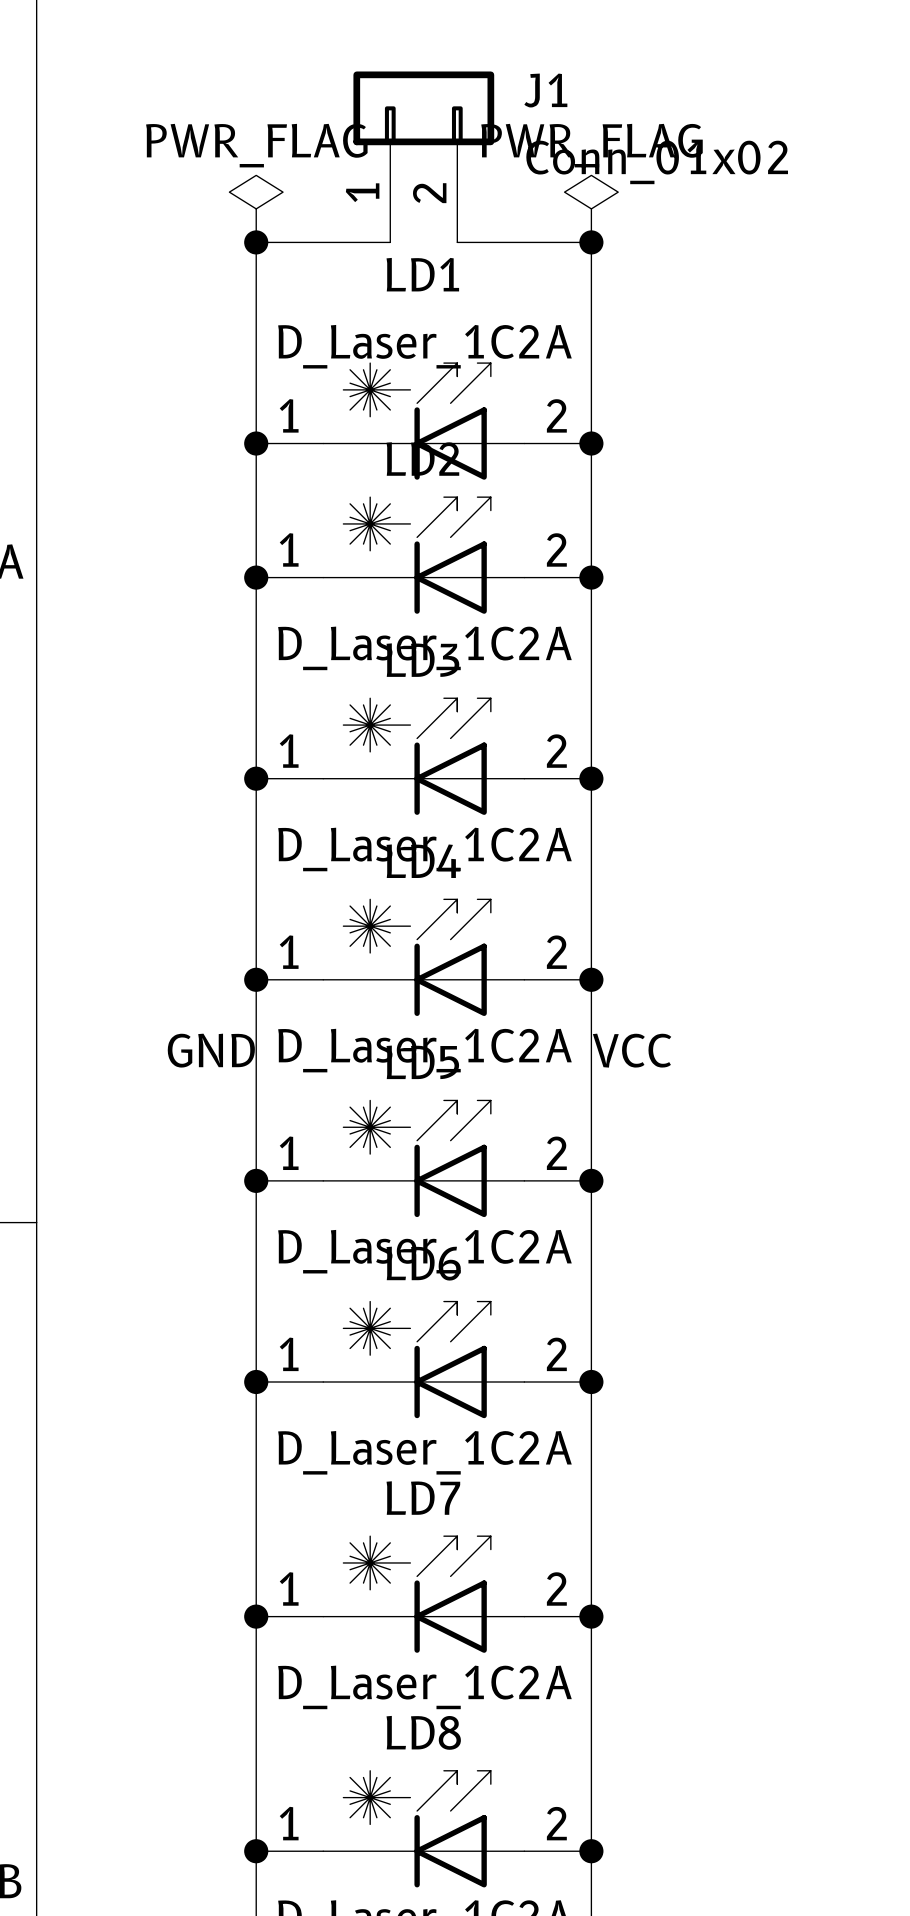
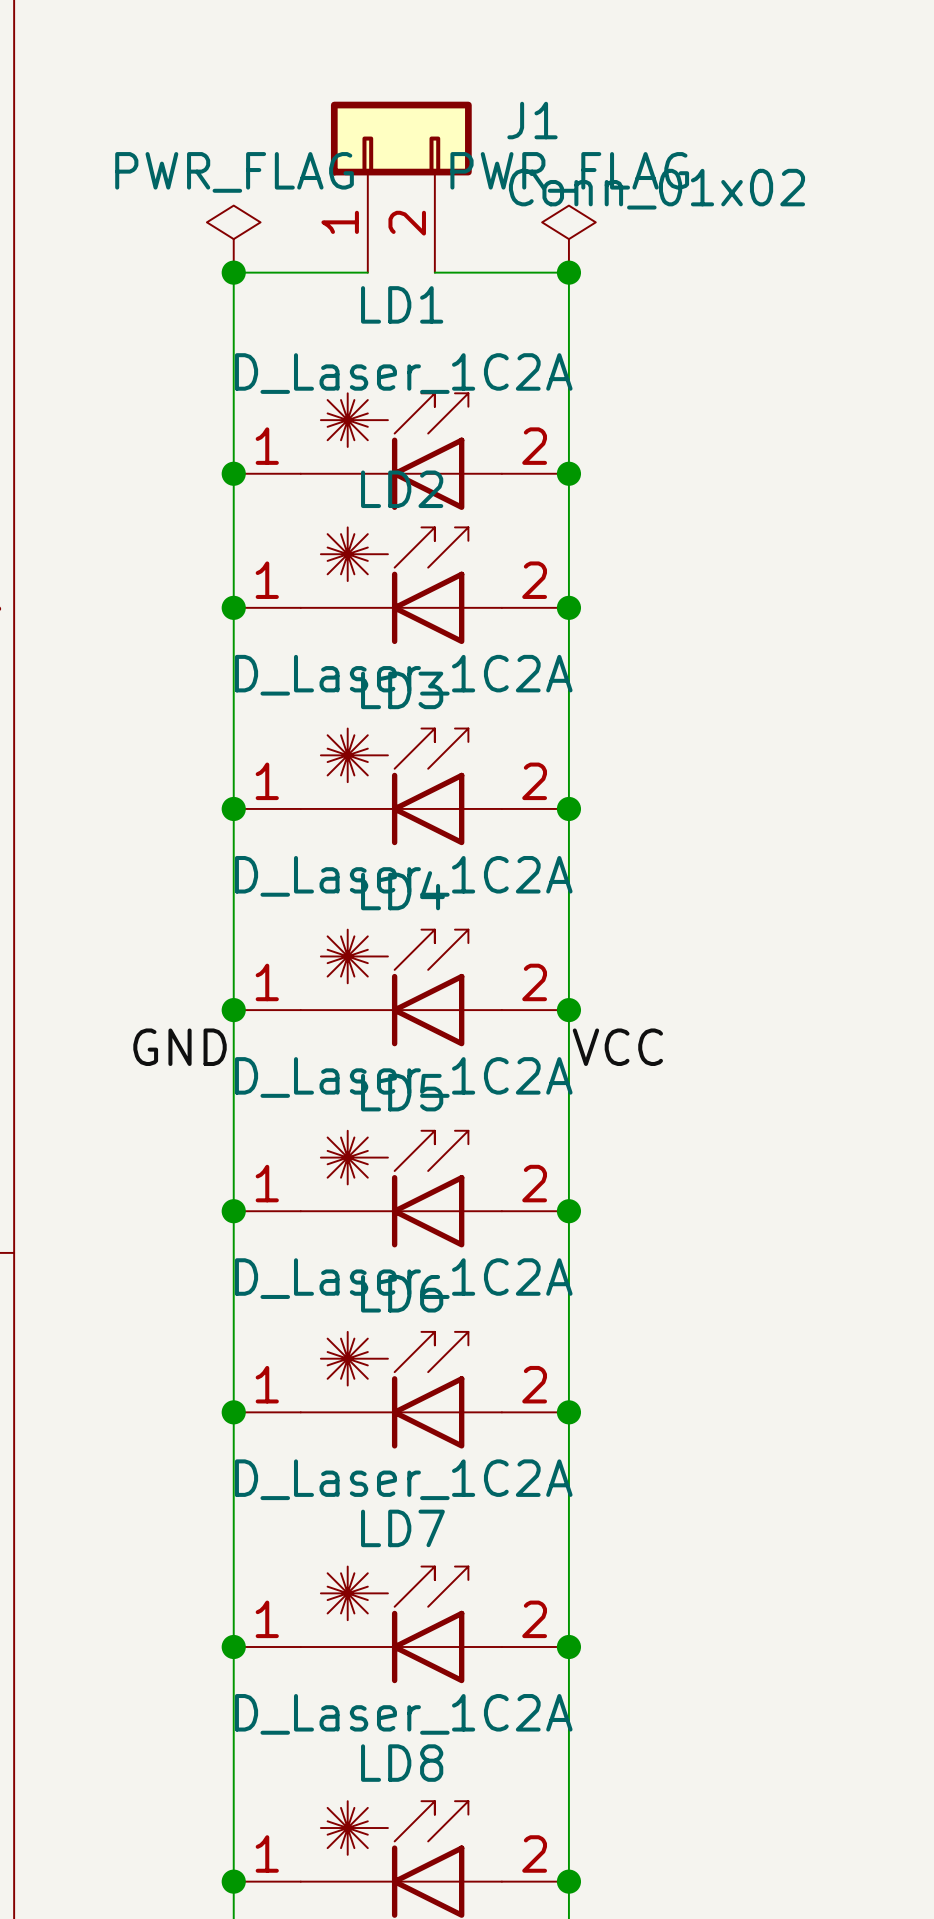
label position: GND (211, 1050) -> GND (180, 1047)
label position: VCC (632, 1050) -> VCC (617, 1047)

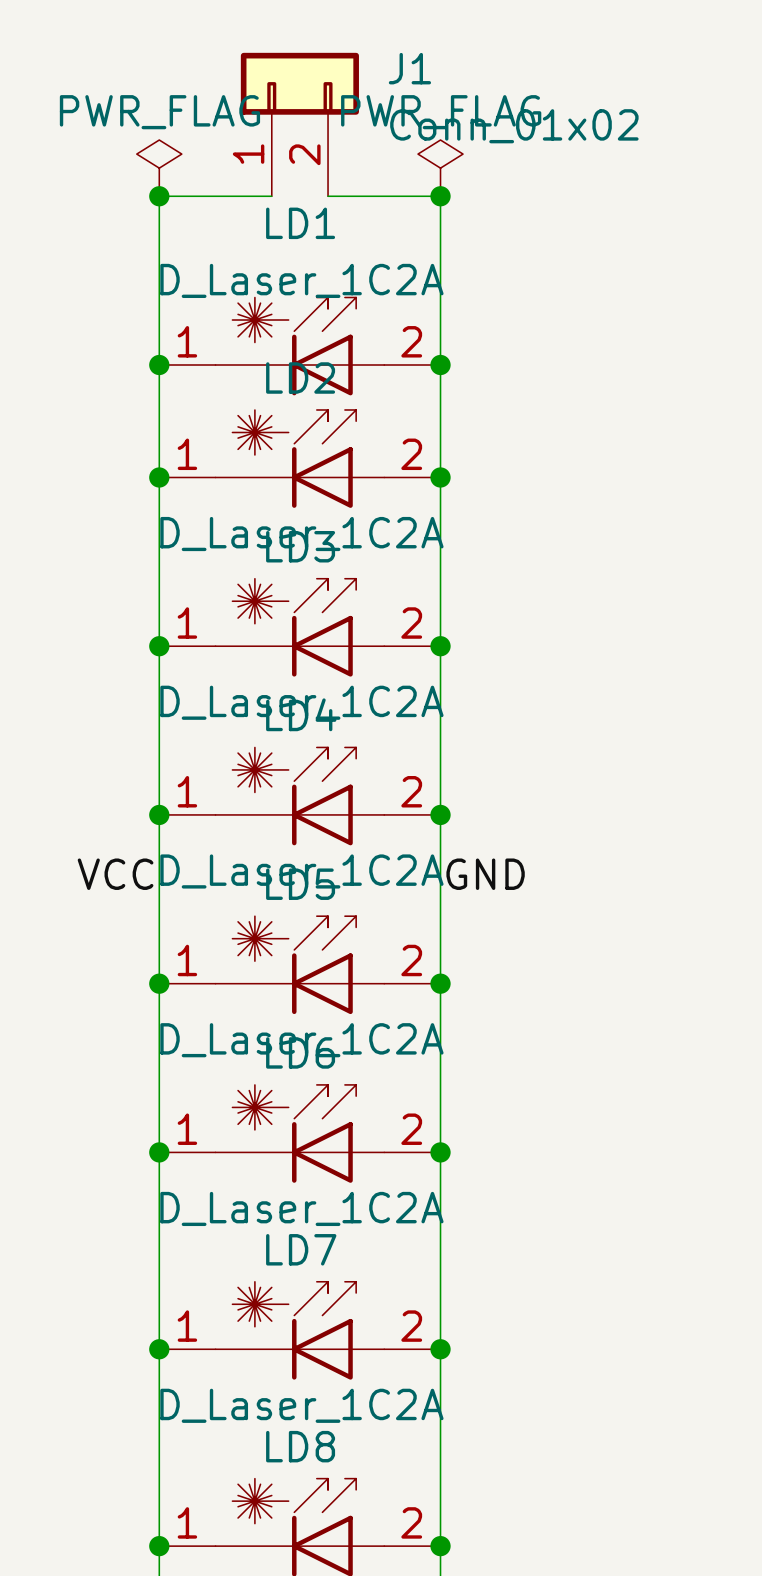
label position: GND (180, 1047) -> GND (485, 874)
label position: VCC (617, 1047) -> VCC (115, 874)

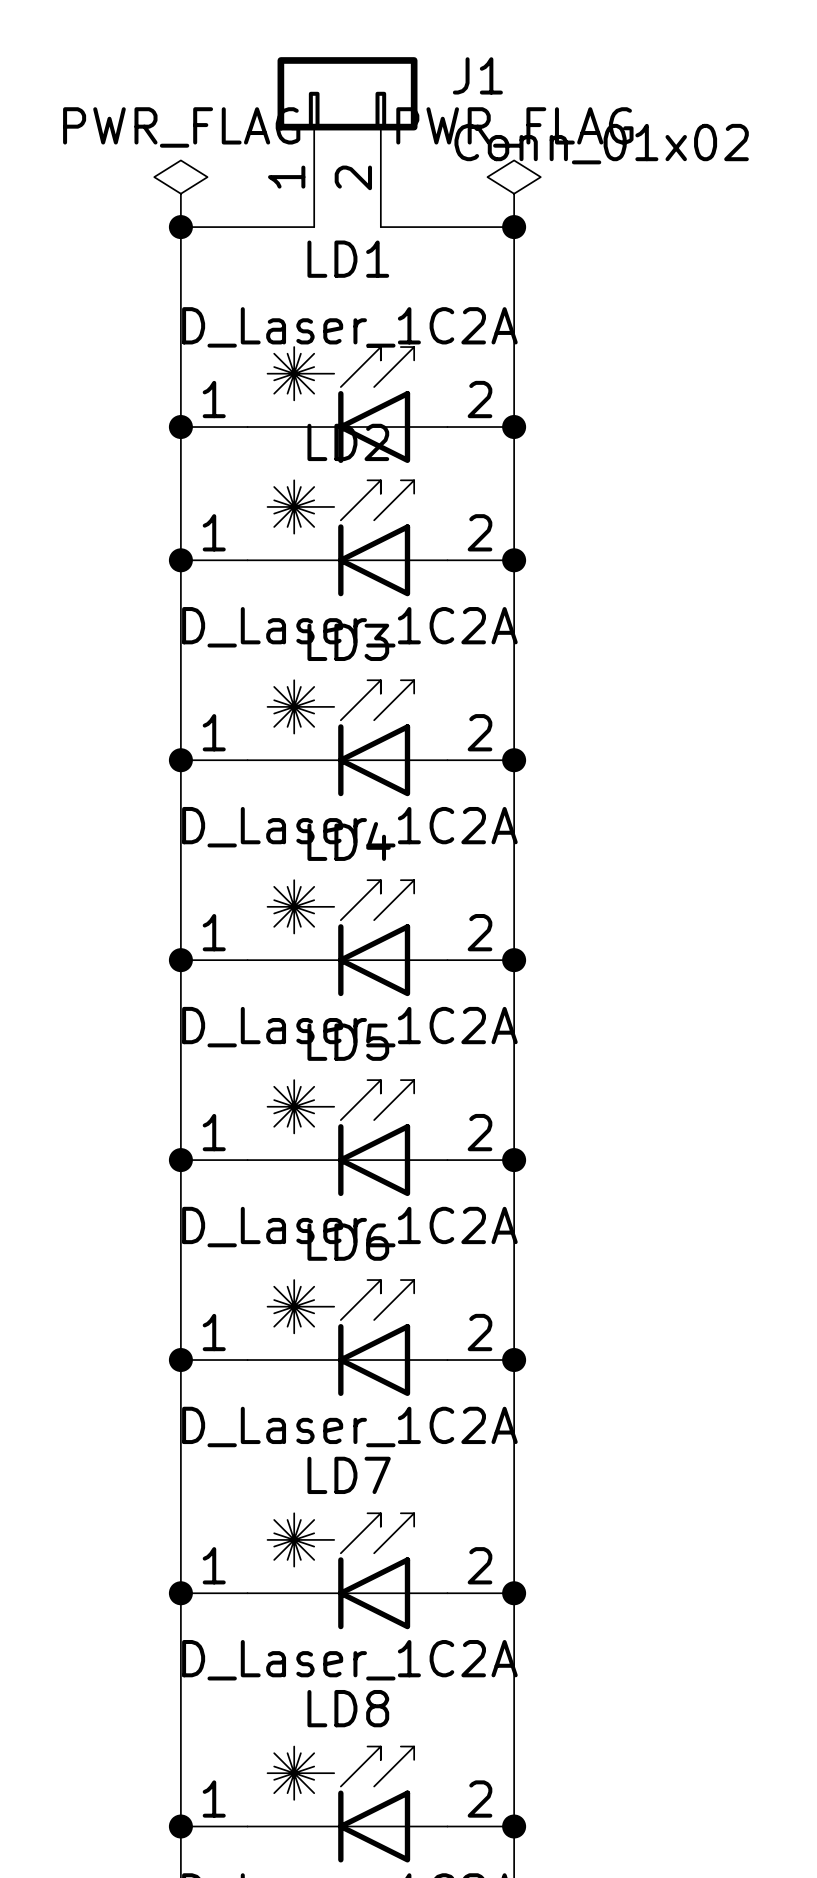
label: VCC (115, 874) -> none
label: GND (485, 874) -> none

